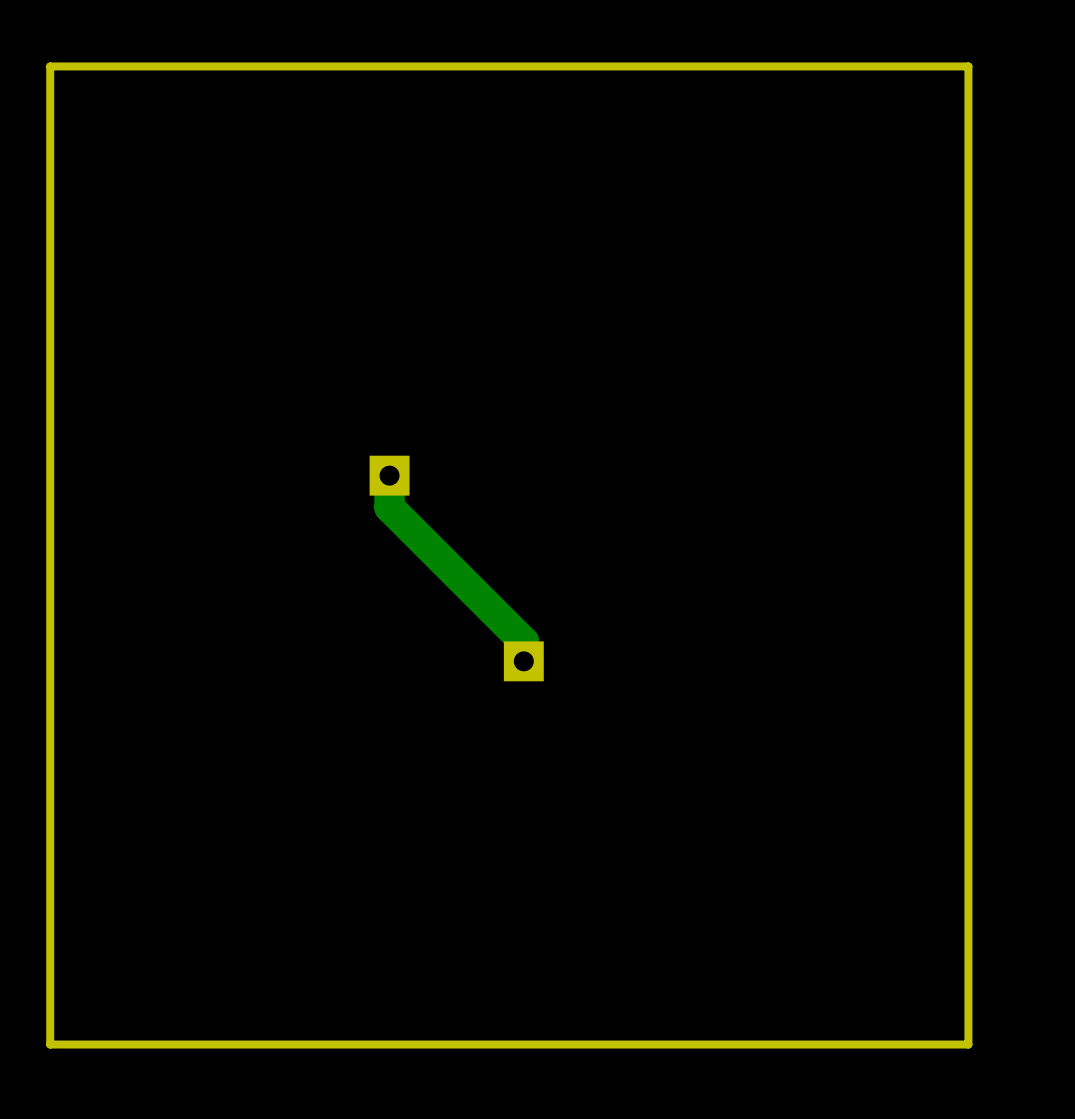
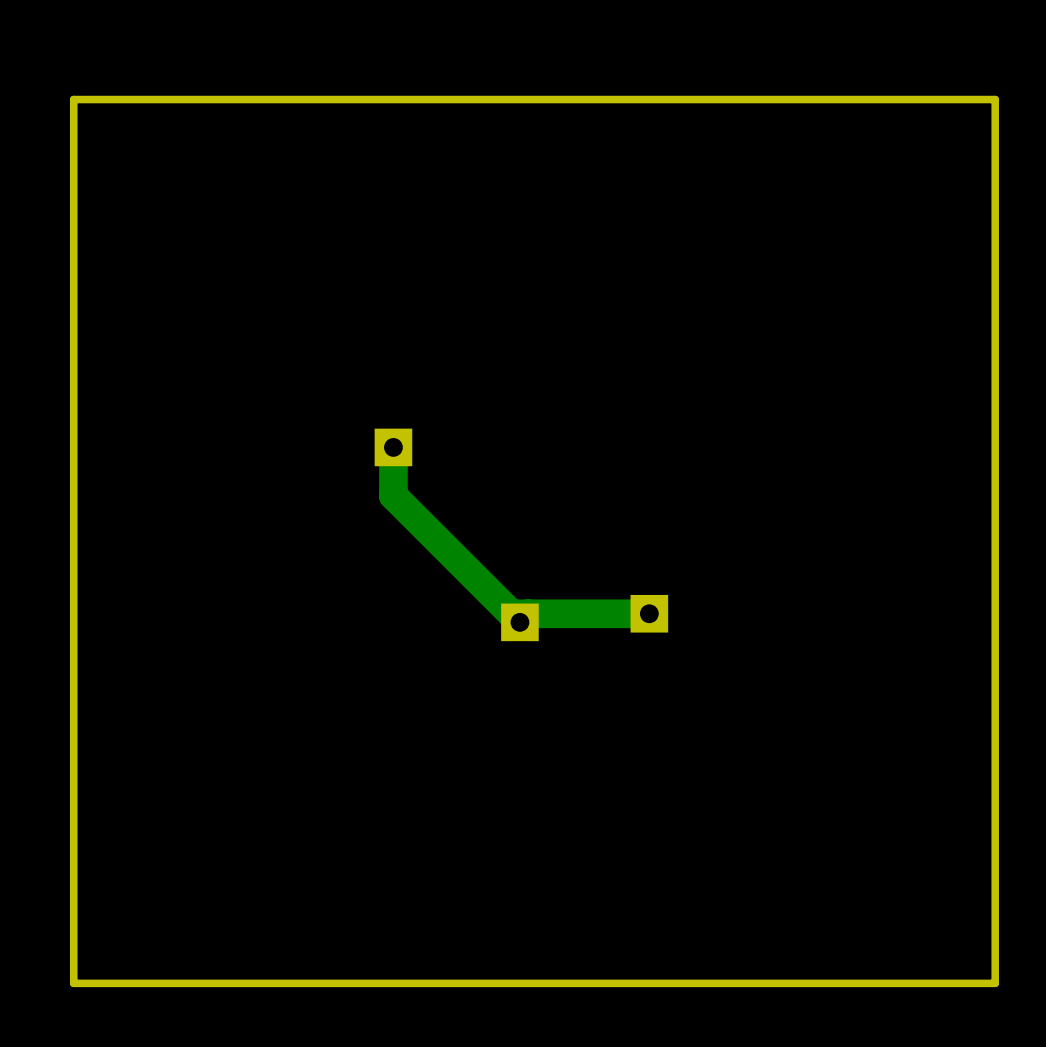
board edge: (50, 106) (50, 66) (968, 66) (968, 1044) -> (73, 99) (995, 99) (995, 983) (938, 983)
track: (389, 507) (523, 641) (523, 661) -> (393, 477) (393, 495) (511, 613) (649, 613)
part: none -> (649, 613)

